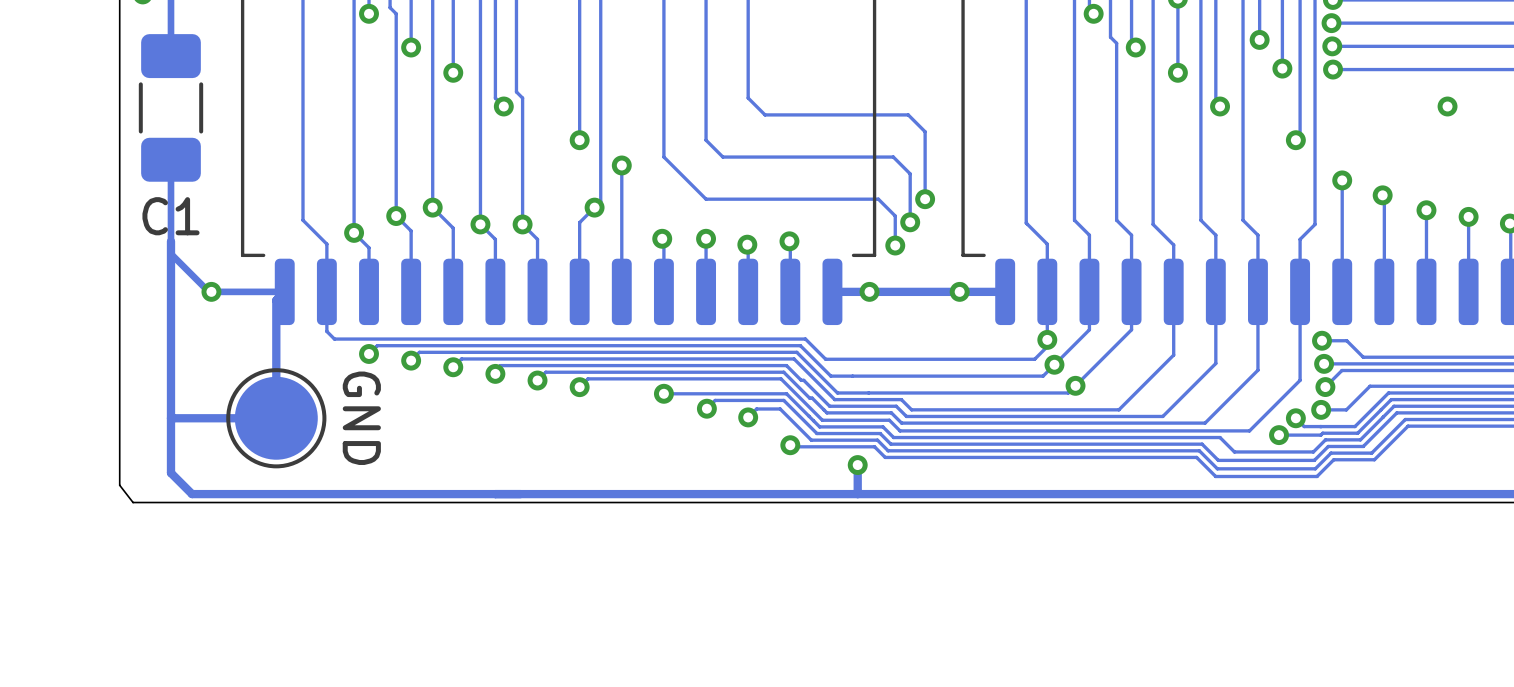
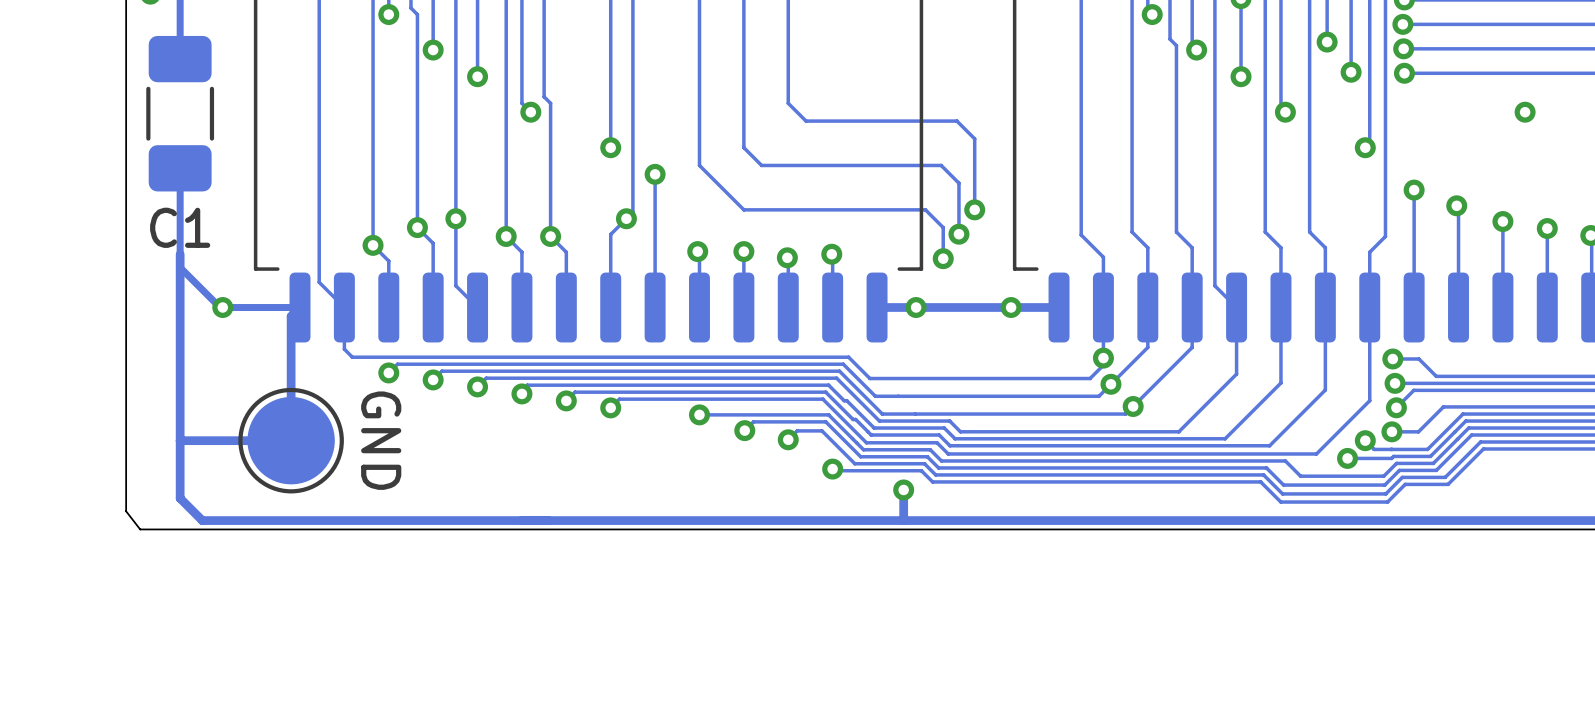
track: (432, 207) (453, 228) (453, 291) -> (455, 218) (455, 285) (477, 307)
track: (302, 220) (326, 244) (326, 291) -> (319, 232) (319, 282) (344, 307)
track: (1153, 224) (1173, 245) (1173, 291) -> (1214, 236) (1214, 285) (1236, 307)

